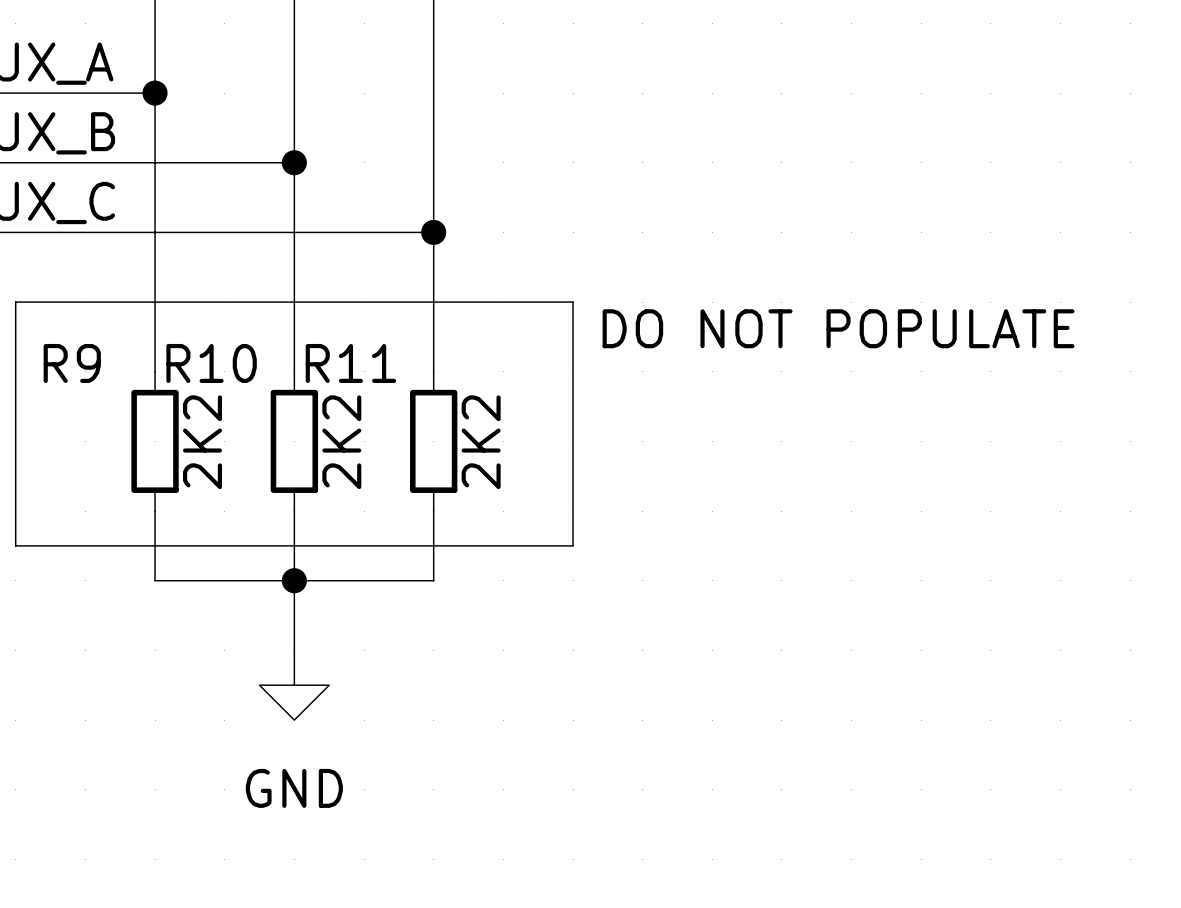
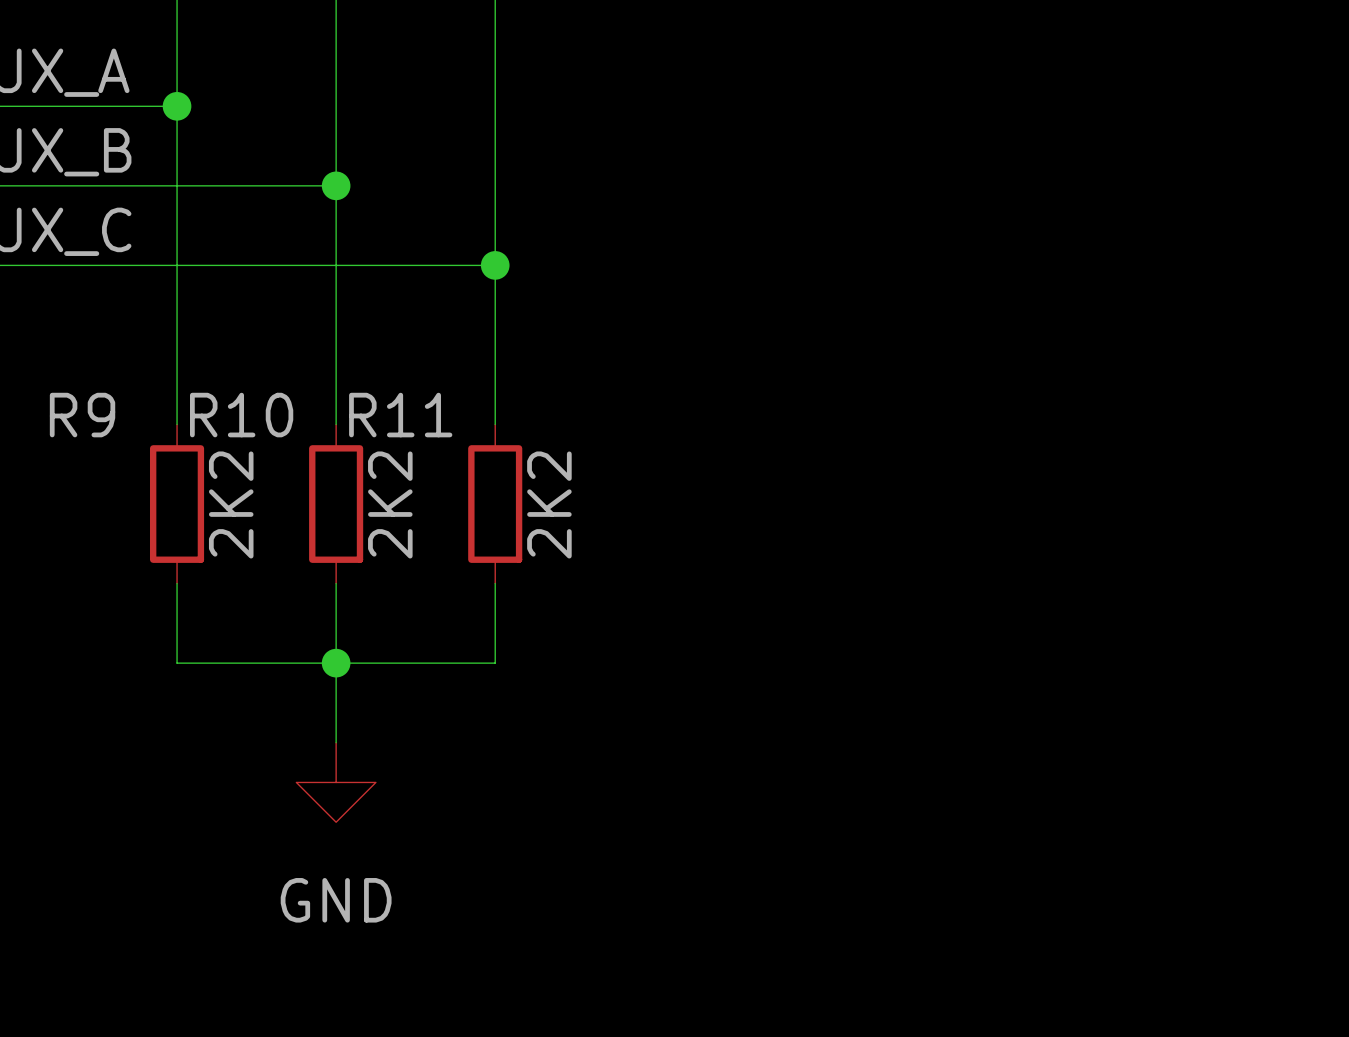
line: (15, 302) (573, 302) (573, 545) (15, 545) (15, 302) -> none
text: DO NOT POPULATE (838, 328) -> none

